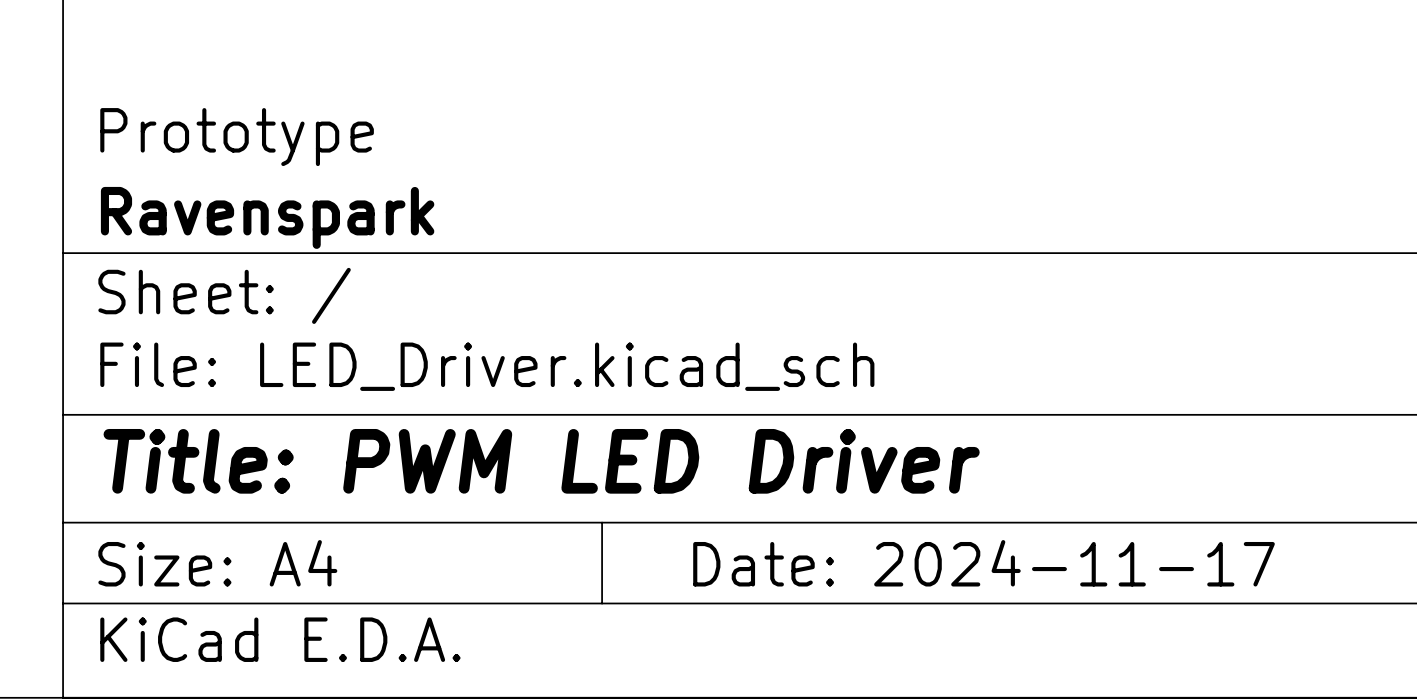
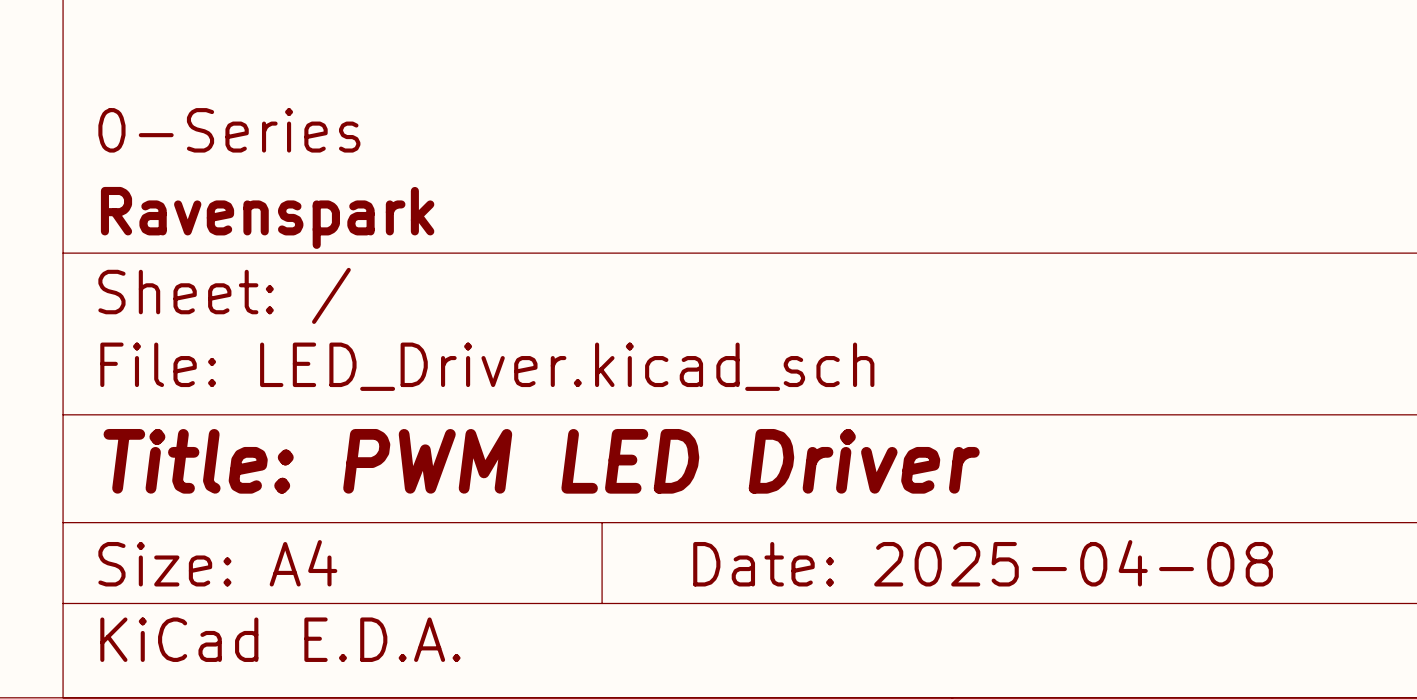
title block: Prototype (237, 137) -> 0-Series (229, 130)
title block: Date: 2024-11-17 (984, 563) -> Date: 2025-04-08 (983, 563)

